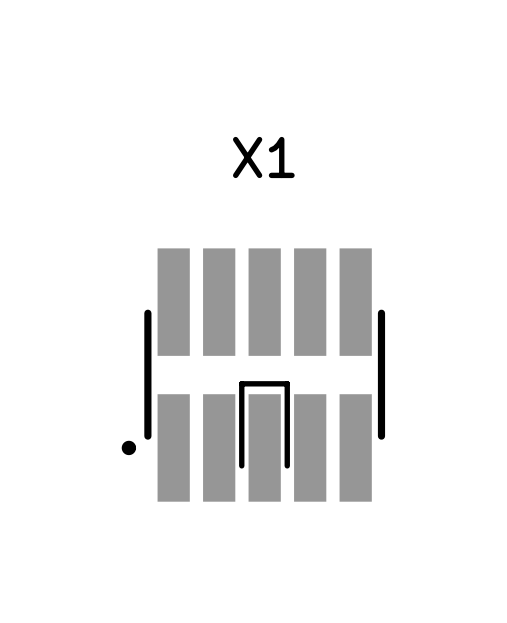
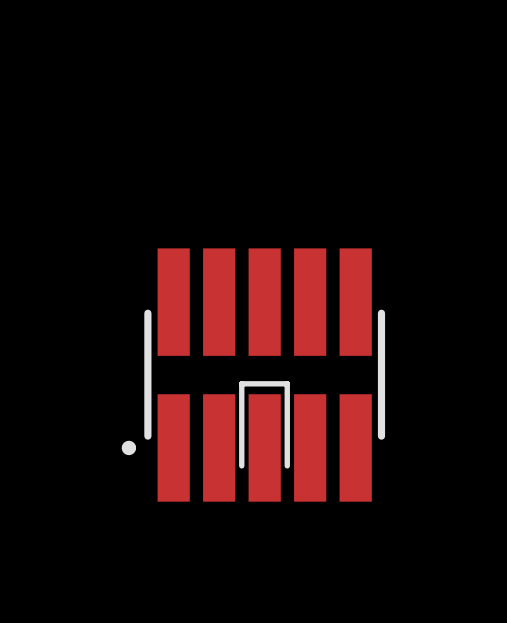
X1 name: X1 (263, 157) -> none

